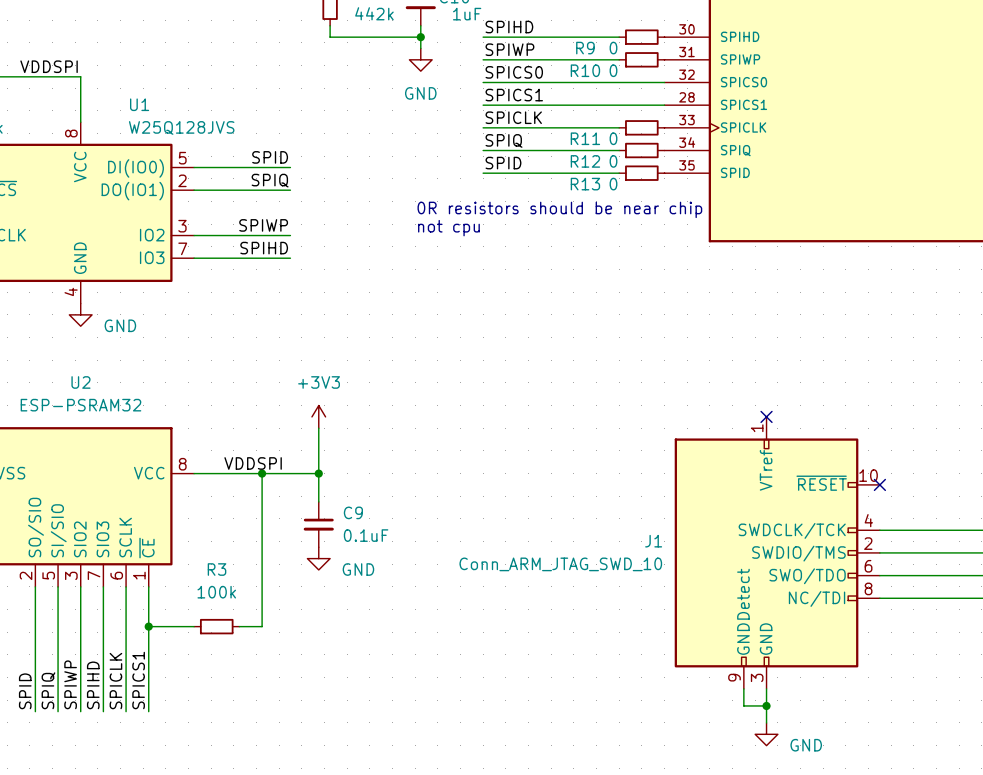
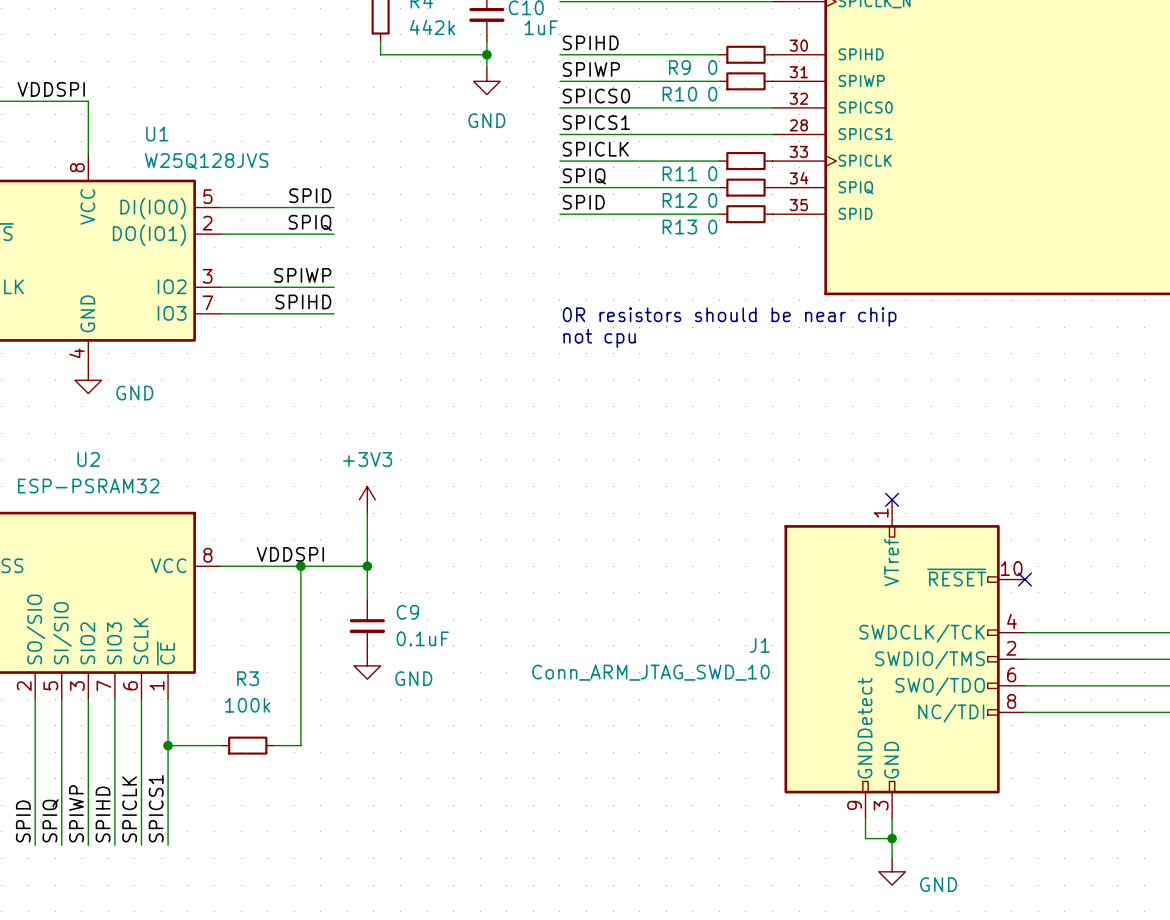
text position: 0R resistors should be near chip (559, 209) -> 0R resistors should be near chip (729, 316)
text position: not cpu (448, 228) -> not cpu (599, 338)

